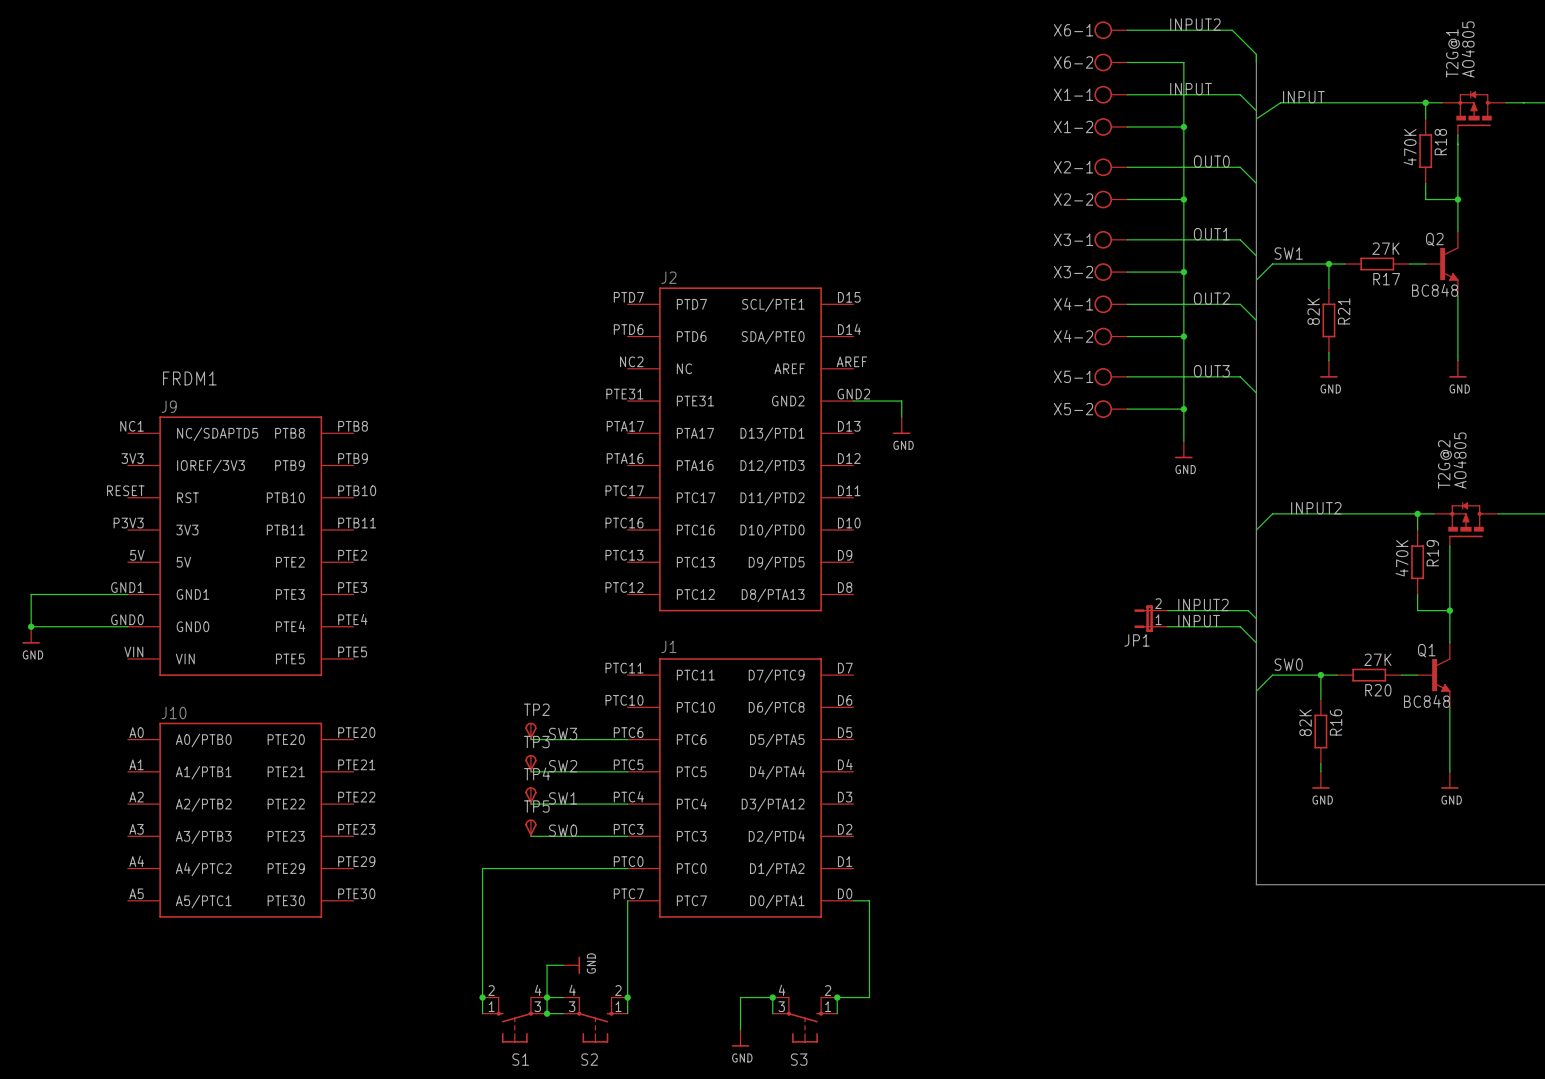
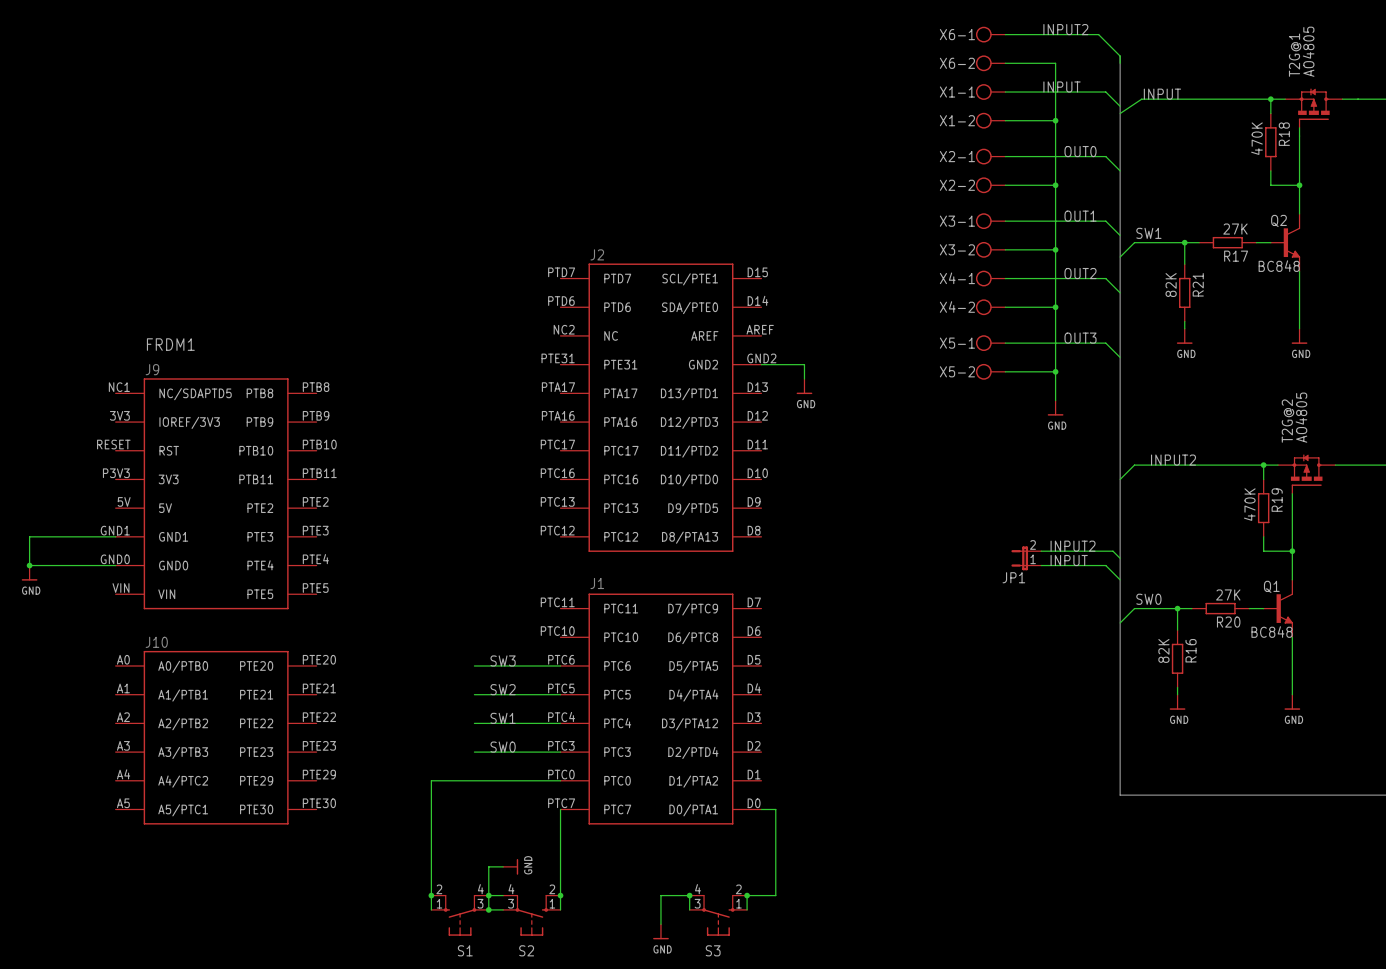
TP2: (530, 731) -> none
TP3: (530, 763) -> none
TP4: (530, 795) -> none
TP5: (530, 827) -> none

